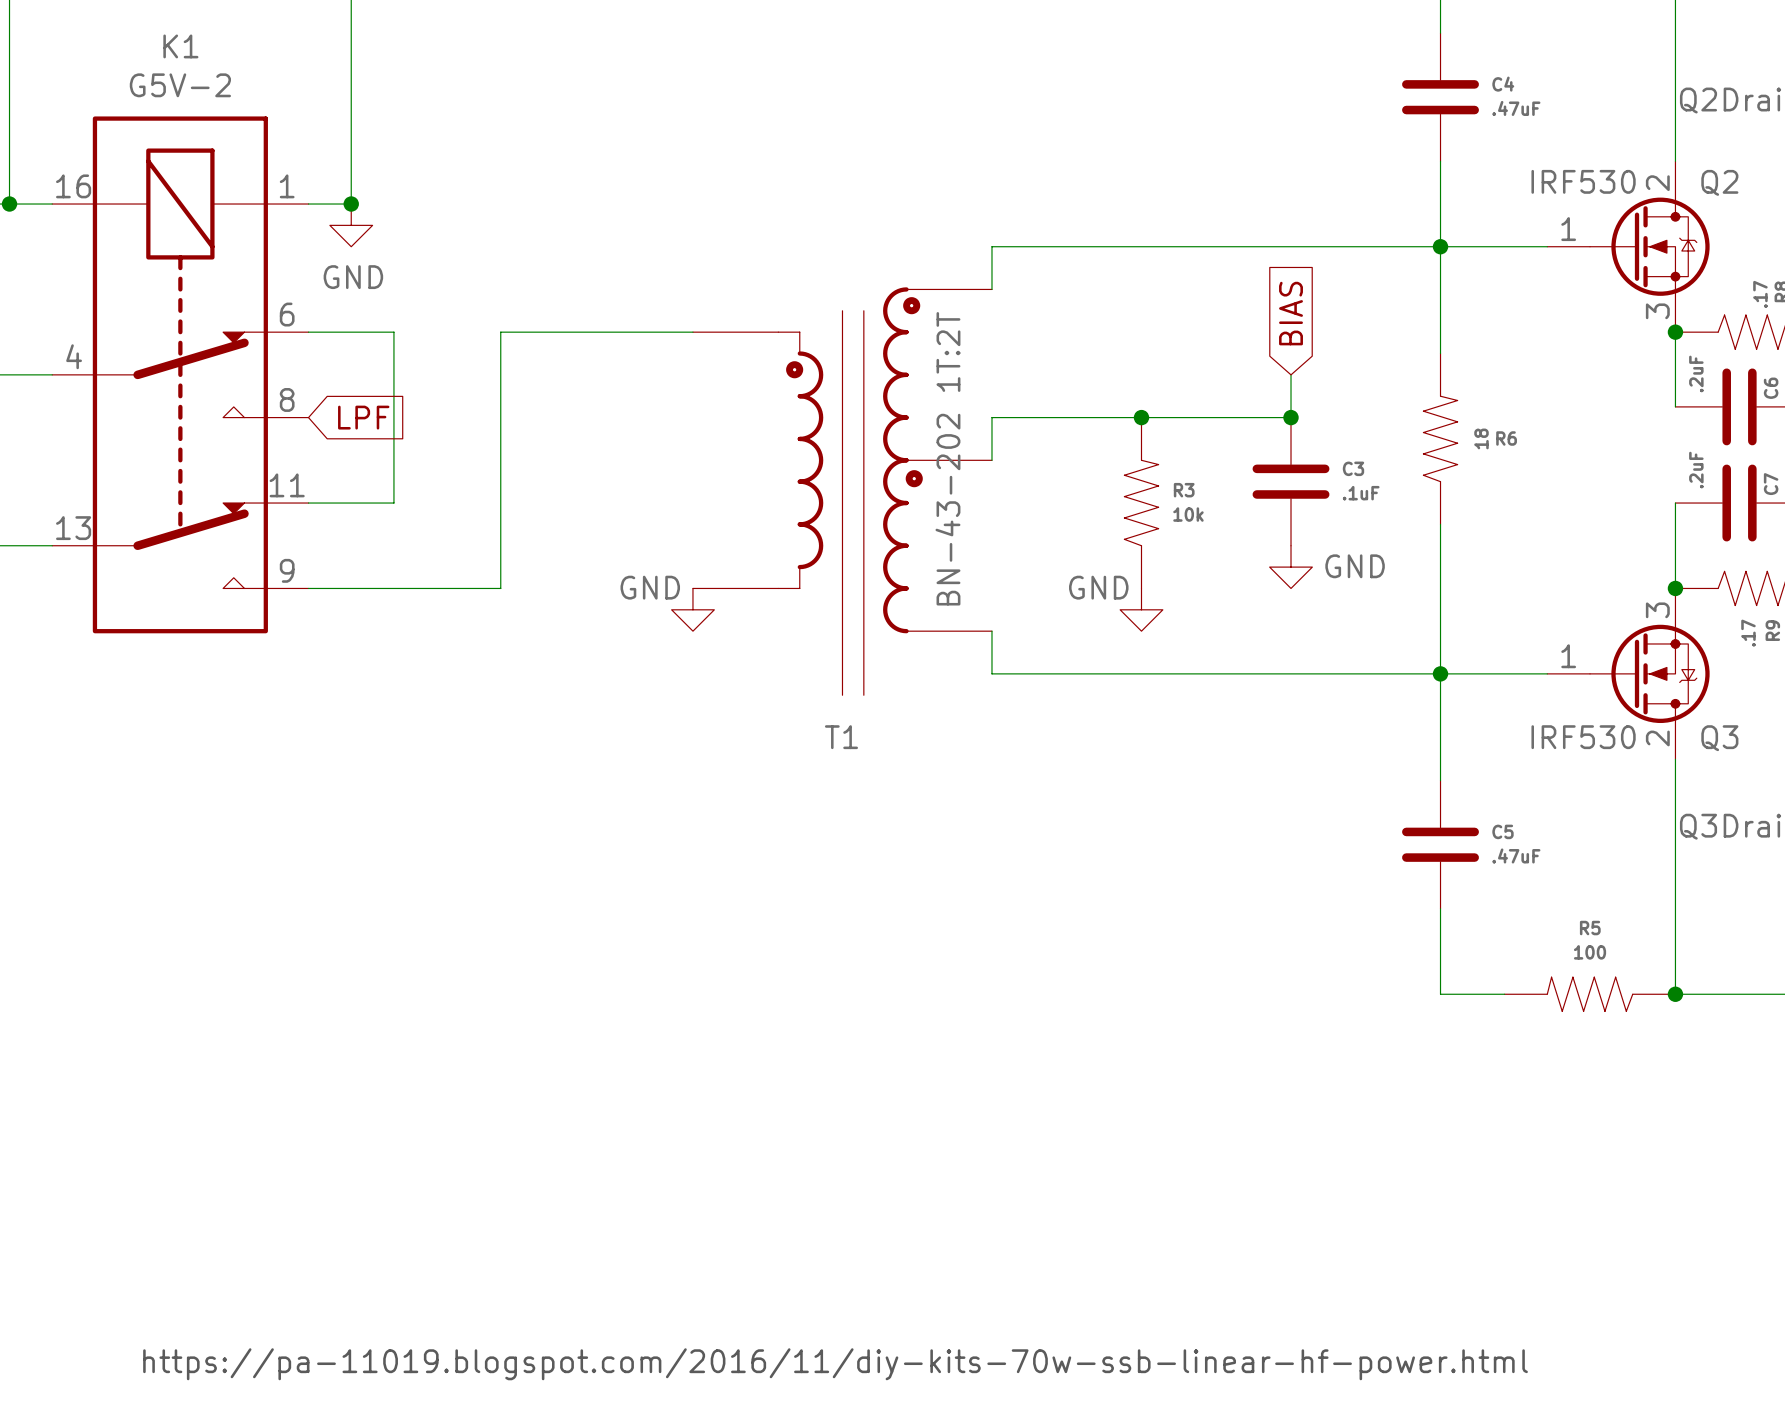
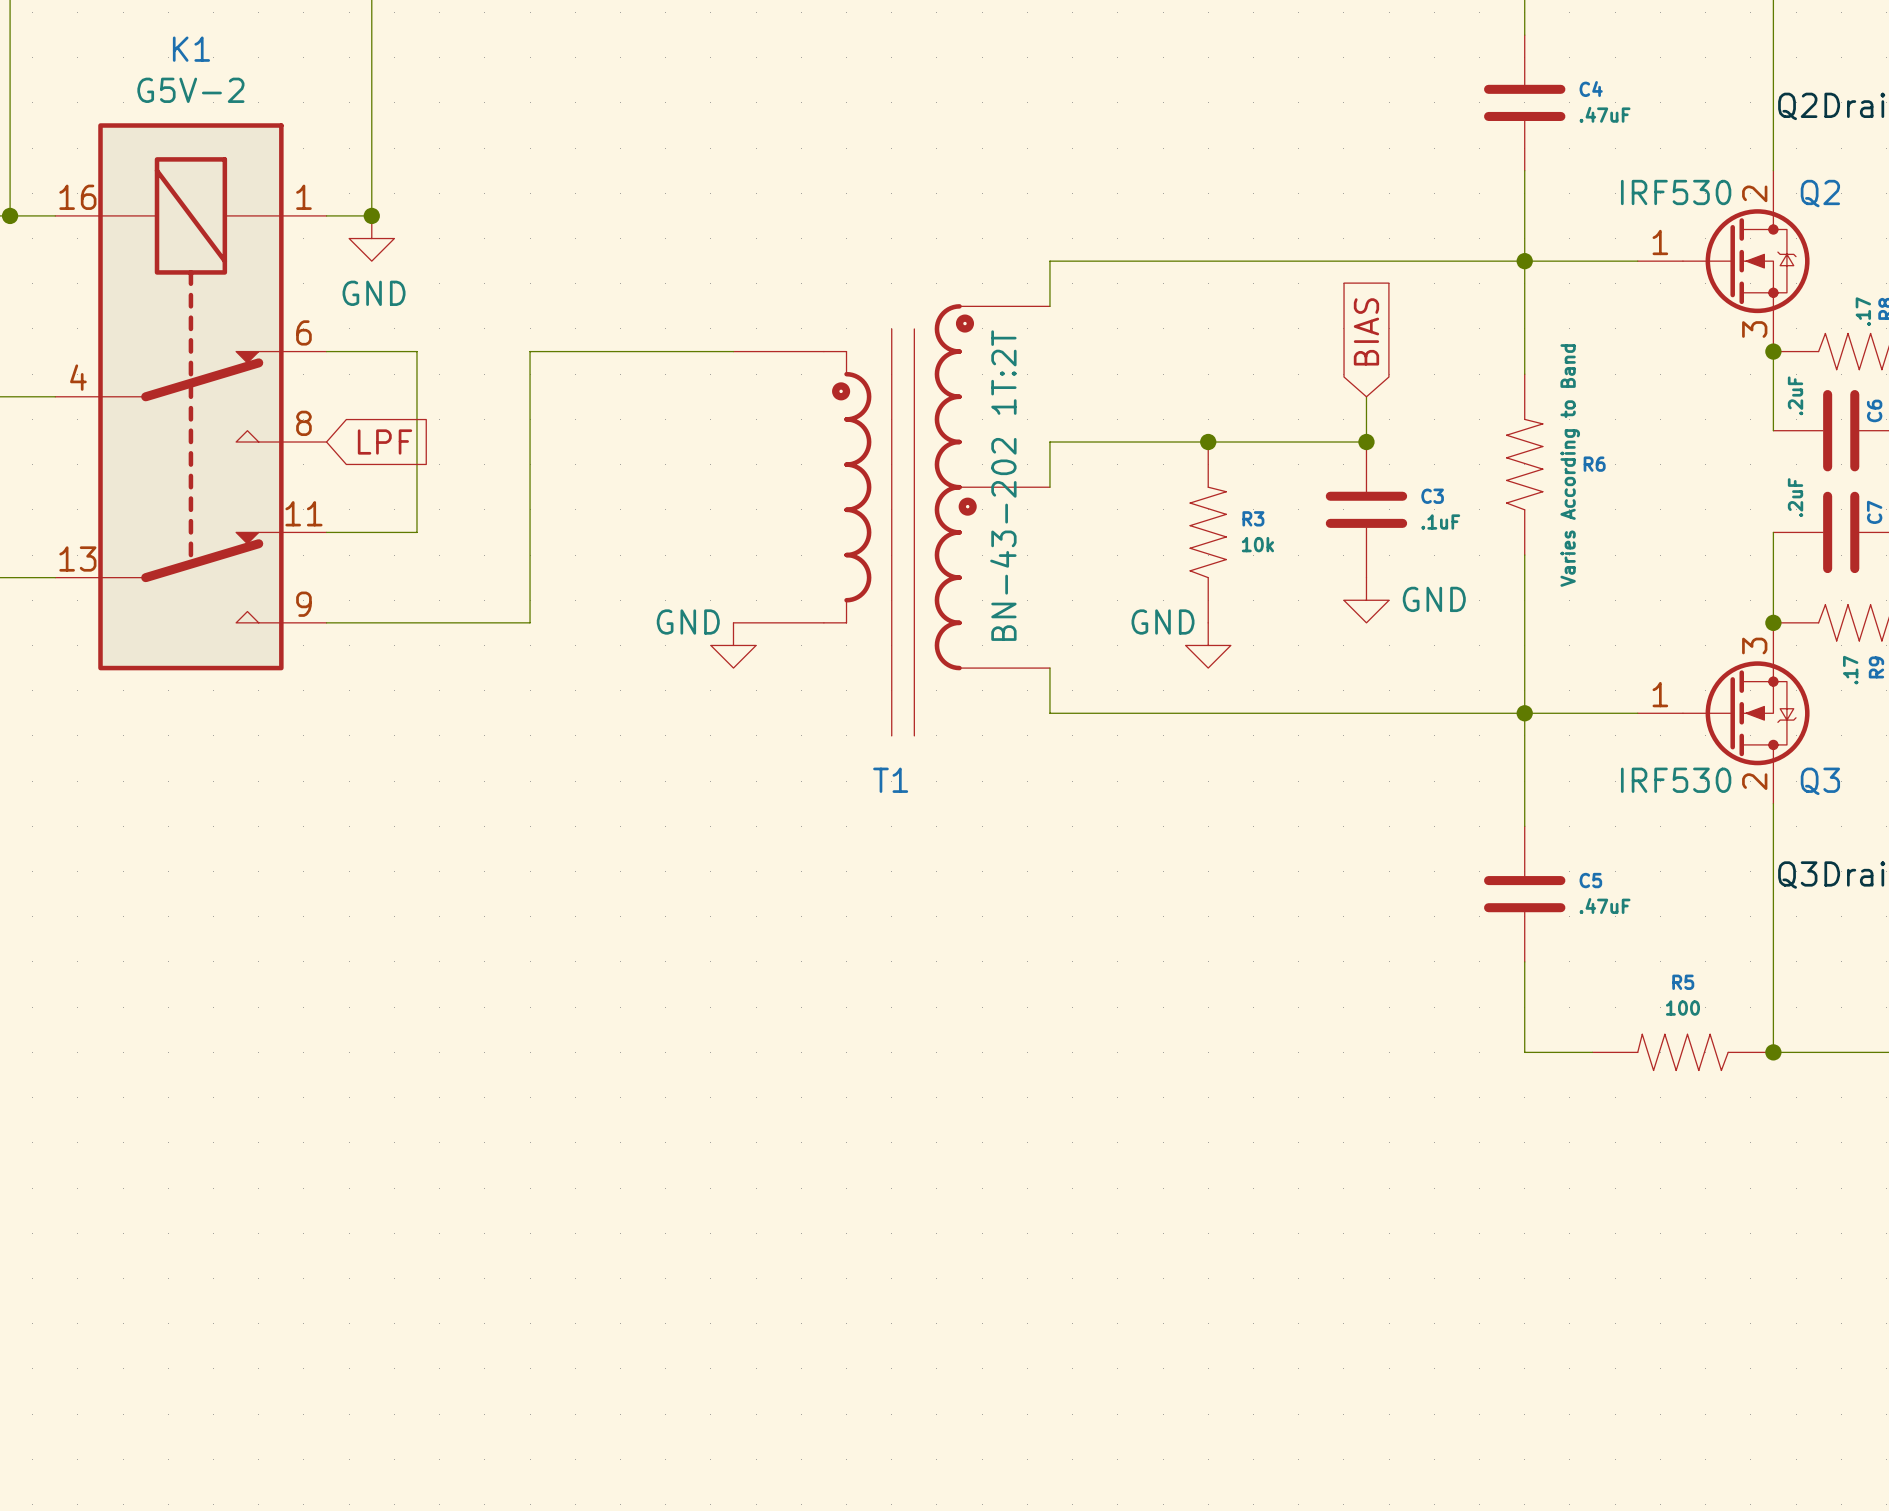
R6 value: 18 (1481, 438) -> Varies According to Band (1570, 465)
text: https://pa-11019.blogspot.com/2016/11/diy-kits-70w-ssb-linear-hf-power.html (835, 1364) -> none

